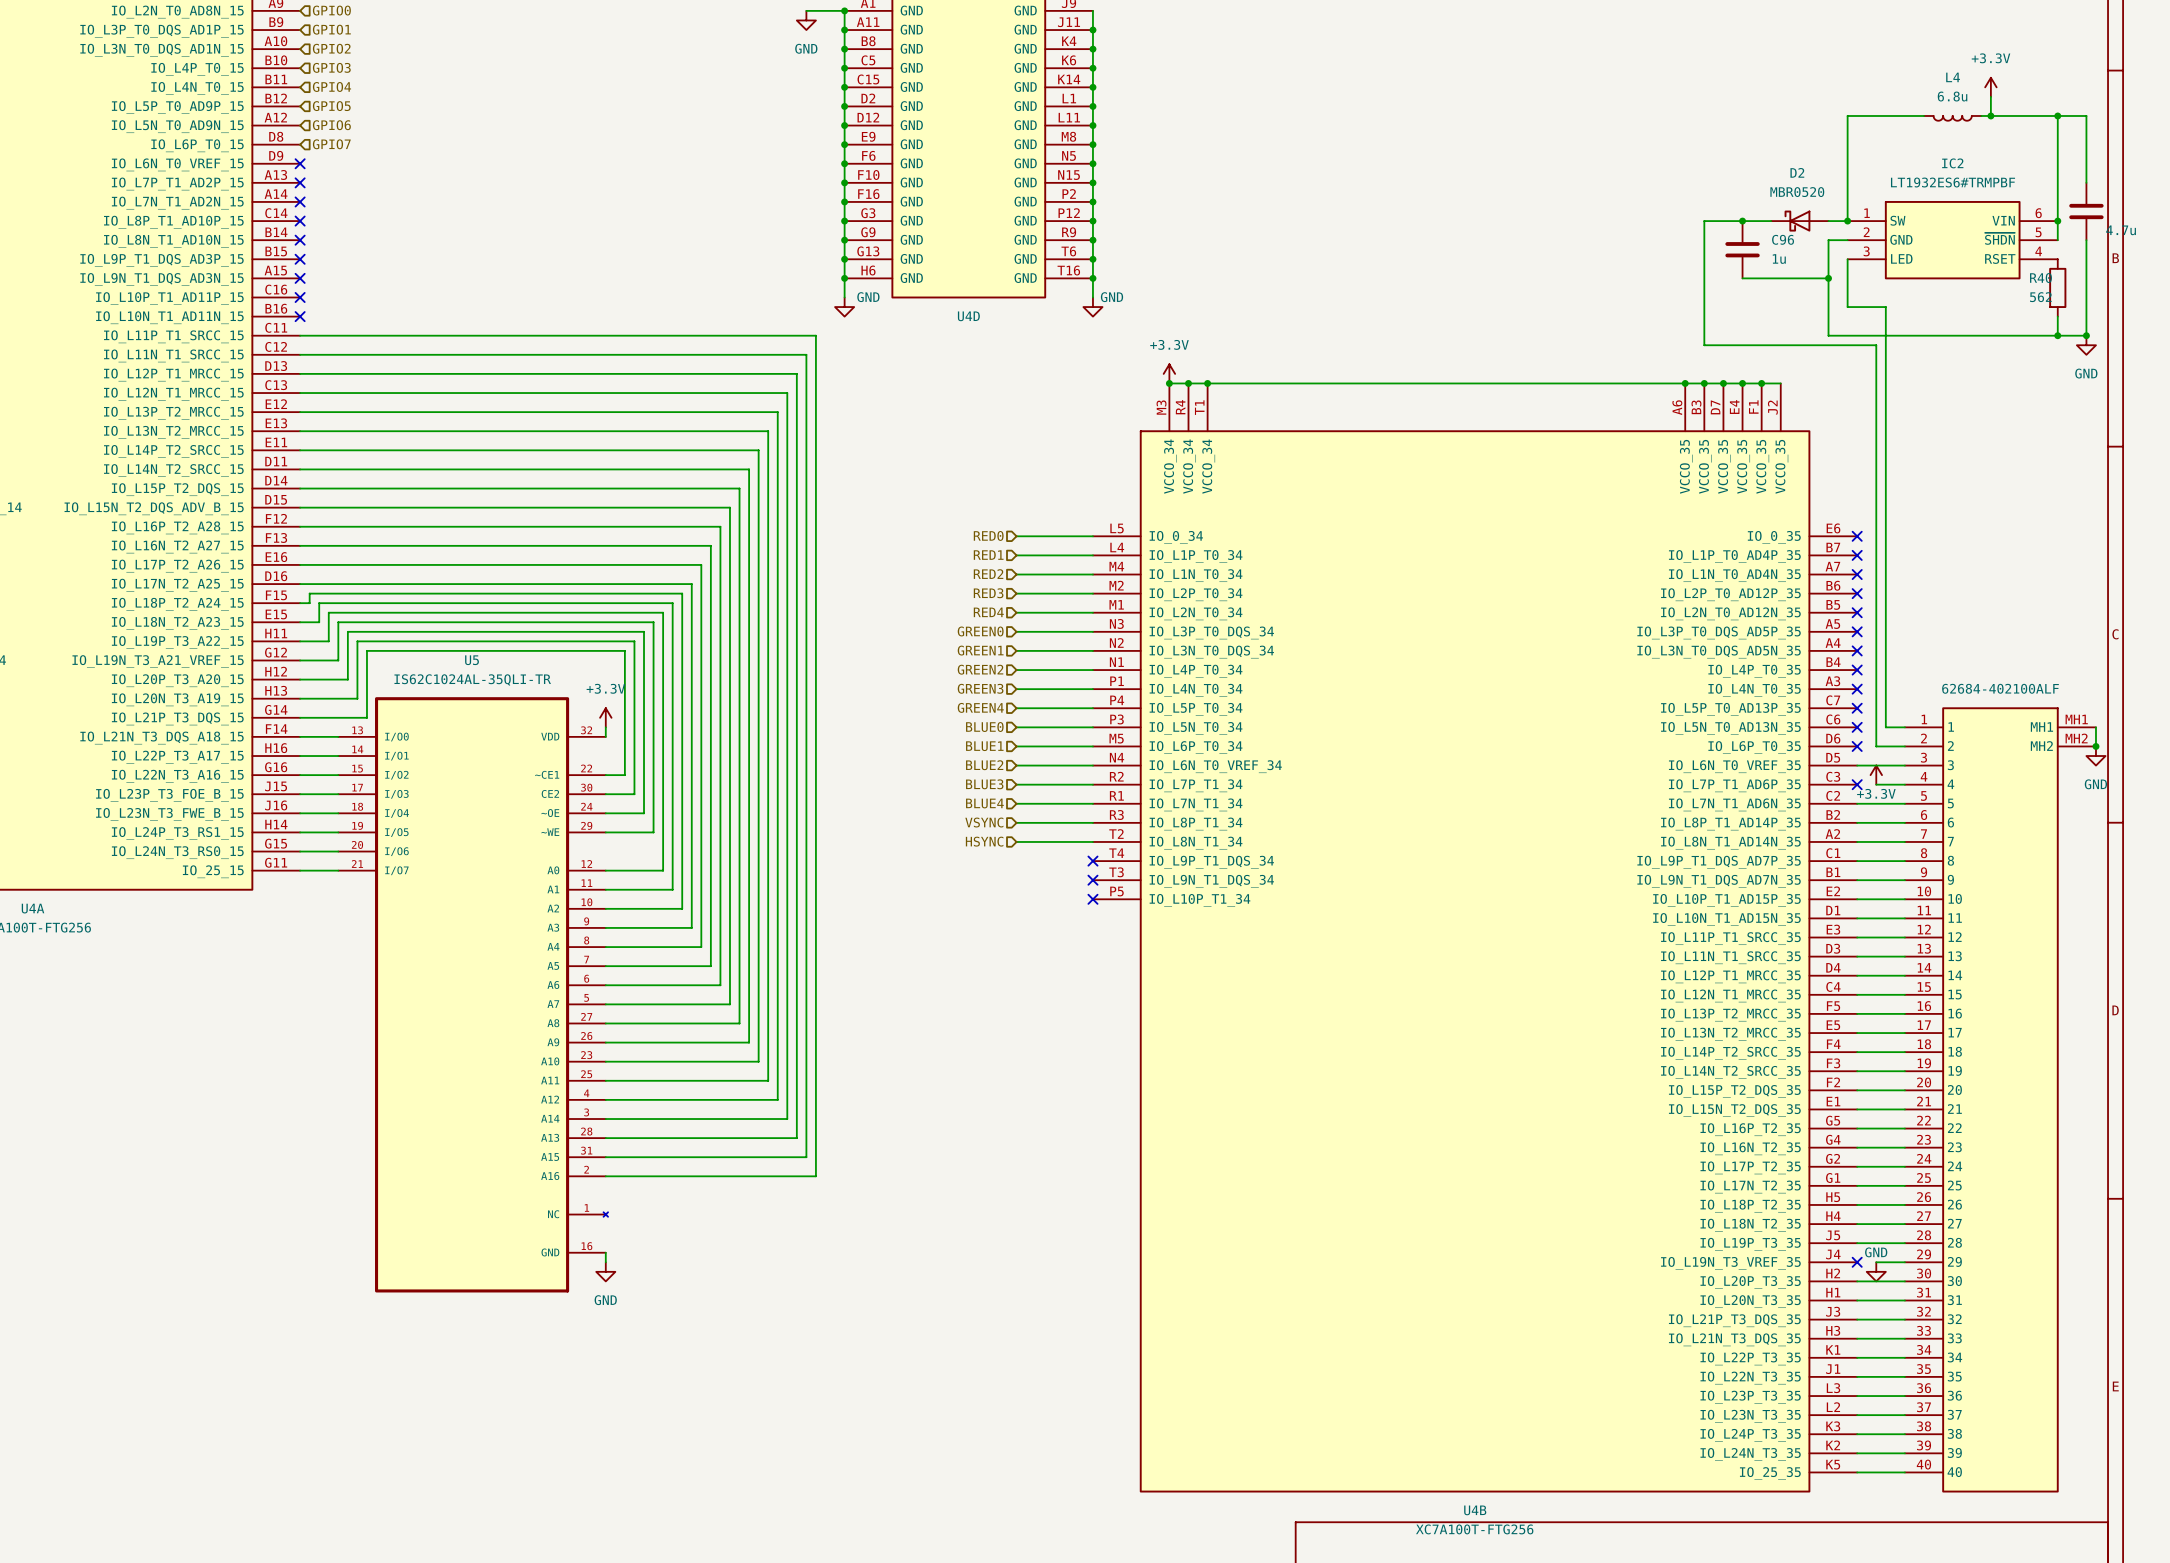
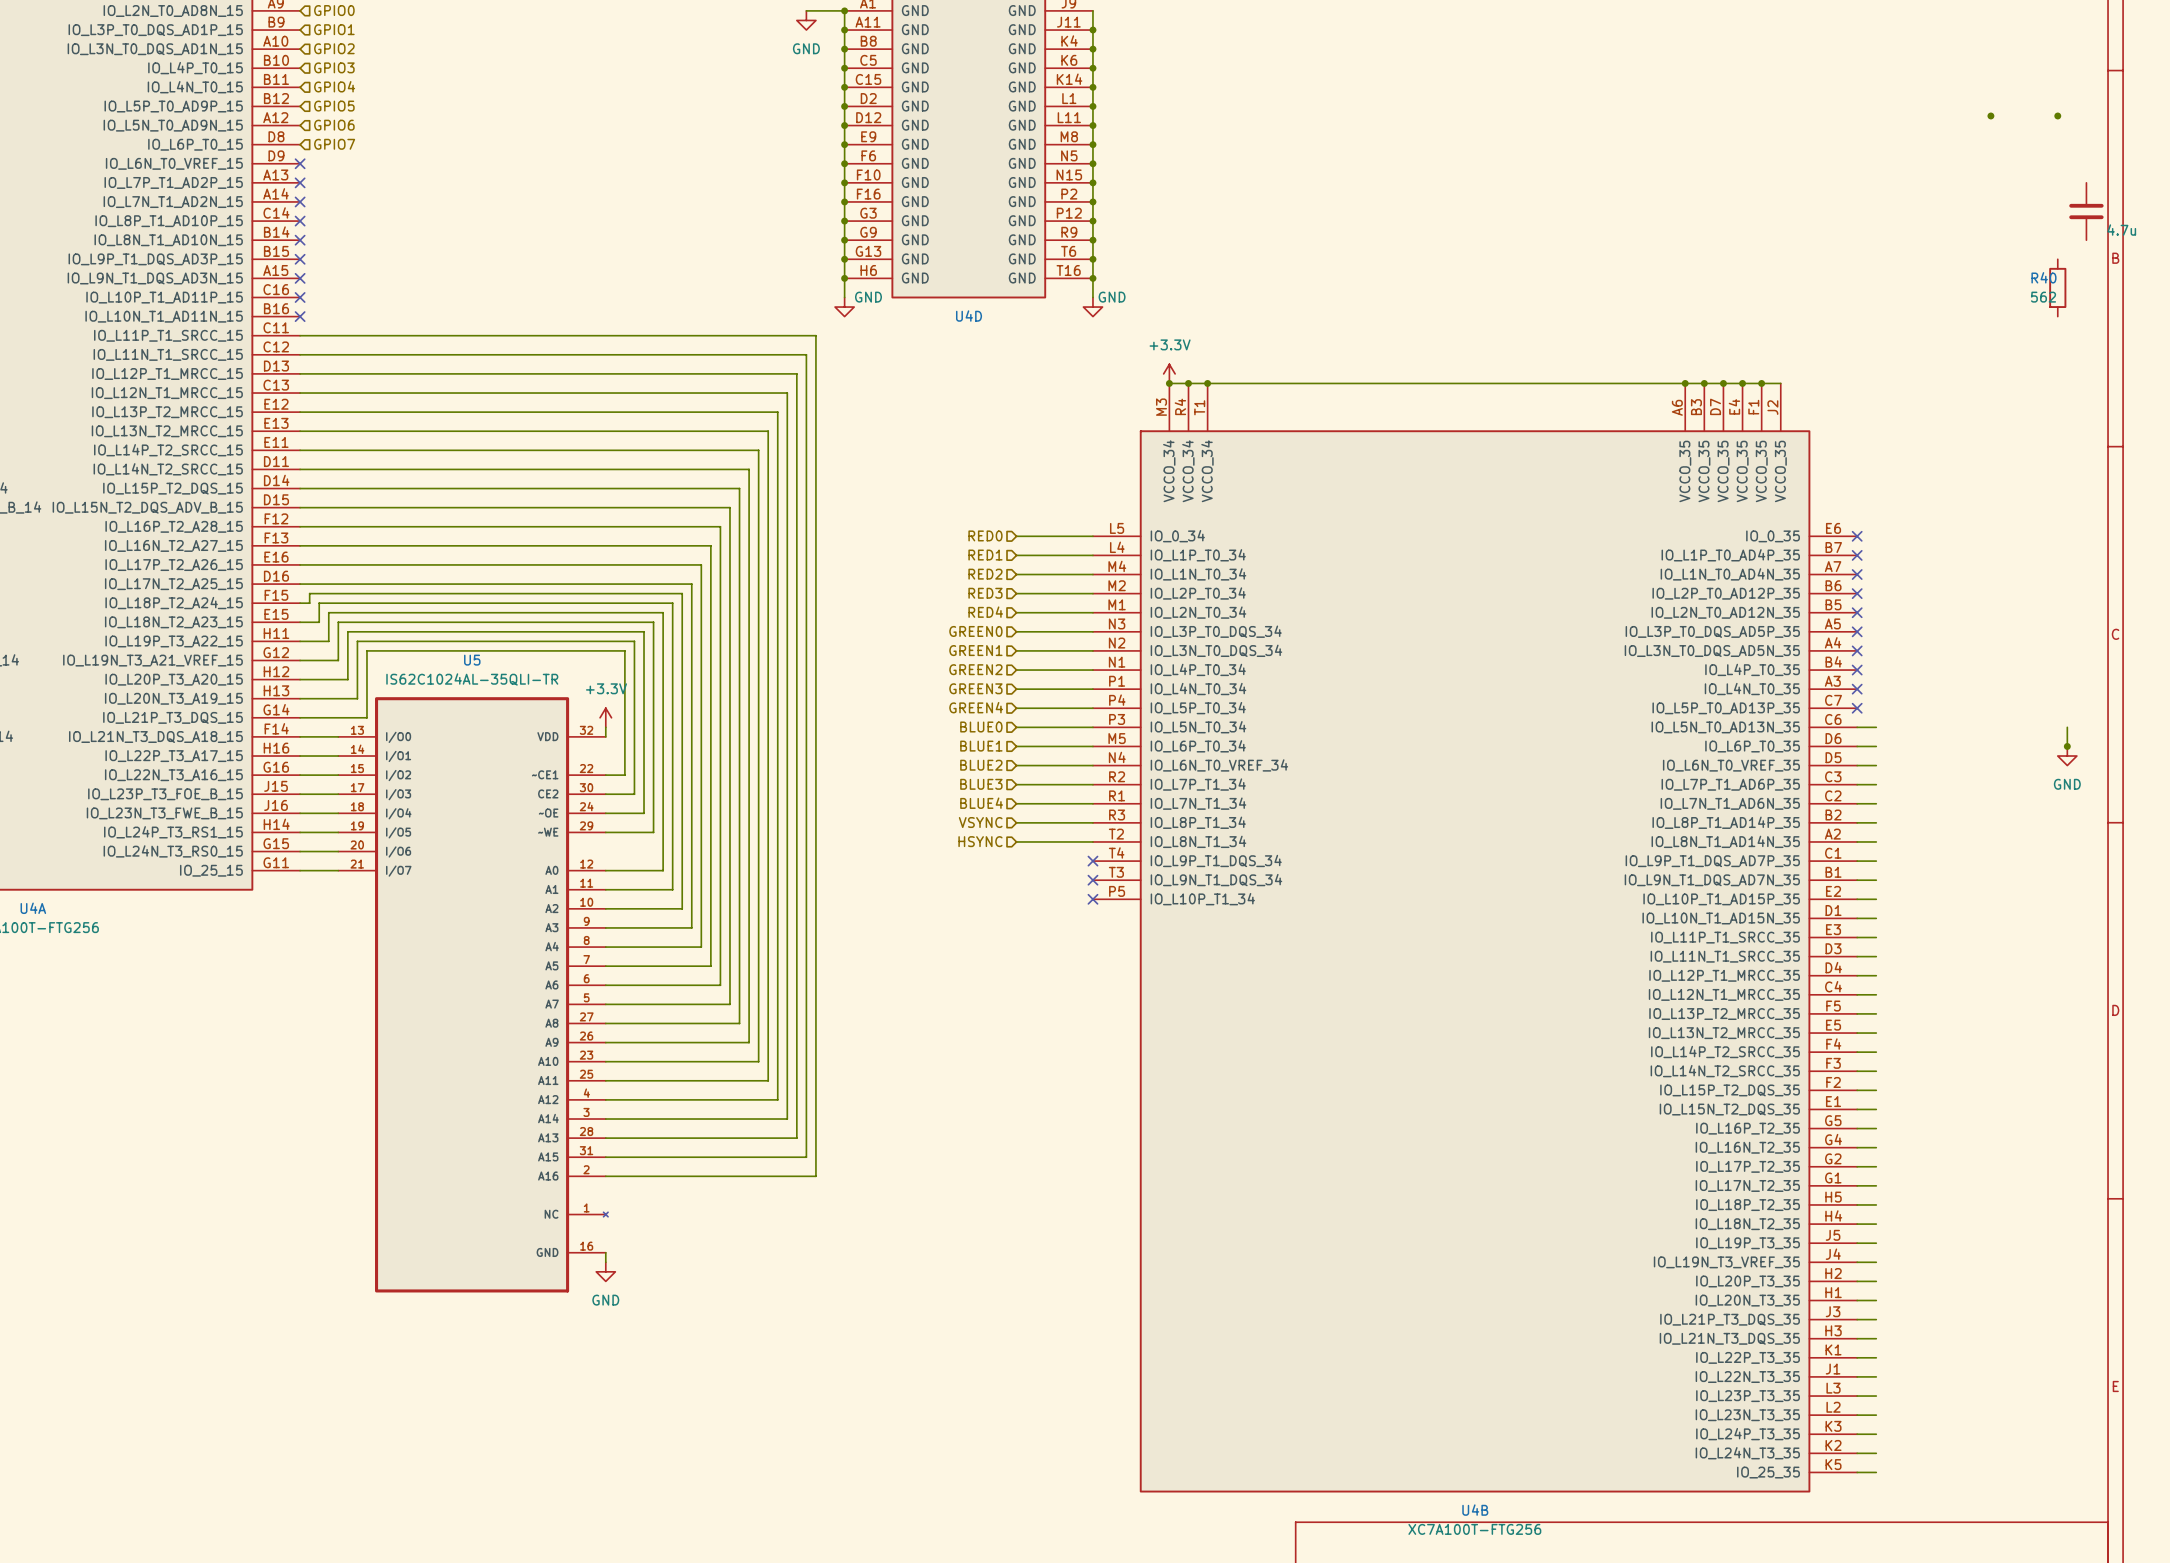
power symbol: +3.3V (1990, 87) -> none
wire: (1990, 96) (1990, 115) -> none
wire: (1924, 115) (1847, 115) (1847, 221) (1828, 221) -> none
wire: (1981, 115) (2086, 115) (2086, 182) -> none
wire: (2057, 115) (2057, 240) -> none
L4: 6.8u (1952, 118) -> none
junction: (1742, 221) -> none
wire: (1771, 221) (1704, 221) (1704, 345) (1876, 345) (1876, 746) (1904, 746) -> none
D2: MBR0520 (1799, 221) -> none
junction: (1847, 221) -> none
junction: (2057, 221) -> none
wire: (1847, 240) (1828, 240) (1828, 335) (2086, 335) (2086, 240) -> none
IC2: LT1932ES6#TRMPBF (1952, 240) -> none
C96: 1u (1742, 249) -> none
wire: (1847, 259) (1847, 307) (1885, 307) (1885, 727) (1904, 727) -> none
wire: (1742, 278) (1828, 278) -> none
junction: (1828, 278) -> none
wire: (2057, 316) (2057, 335) -> none
junction: (2057, 335) -> none
junction: (2086, 335) -> none
power symbol: GND (2086, 345) -> none
wire: none -> (1857, 727) (1876, 727)
no-connect mark: (1857, 727) -> none
wire: (2095, 727) (2095, 746) -> (2067, 727) (2067, 746)
wire: none -> (1857, 746) (1876, 746)
no-connect mark: (1857, 746) -> none
junction position: (2095, 746) -> (2067, 746)
power symbol position: GND (2095, 756) -> GND (2067, 756)
wire: (1876, 765) (1904, 765) -> none
power symbol: +3.3V (1876, 775) -> none
no-connect mark: (1857, 784) -> none
wire: (1876, 784) (1904, 784) -> (1876, 784) (1857, 784)
wire: (1876, 803) (1904, 803) -> none
wire: (1876, 822) (1904, 822) -> none
wire: (1876, 841) (1904, 841) -> none
wire: (1876, 861) (1904, 861) -> none
wire: (1876, 880) (1904, 880) -> none
wire: (1876, 899) (1904, 899) -> none
wire: (1876, 918) (1904, 918) -> none
wire: (1876, 937) (1904, 937) -> none
wire: (1876, 956) (1904, 956) -> none
wire: (1876, 975) (1904, 975) -> none
wire: (1876, 994) (1904, 994) -> none
wire: (1876, 1013) (1904, 1013) -> none
wire: (1876, 1033) (1904, 1033) -> none
wire: (1876, 1052) (1904, 1052) -> none
wire: (1876, 1071) (1904, 1071) -> none
wire: (1876, 1090) (1904, 1090) -> none
part: 62684-402100ALF (2000, 1099) -> none
wire: (1876, 1109) (1904, 1109) -> none
wire: (1876, 1128) (1904, 1128) -> none
wire: (1876, 1147) (1904, 1147) -> none
wire: (1876, 1166) (1904, 1166) -> none
wire: (1876, 1185) (1904, 1185) -> none
wire: (1876, 1204) (1904, 1204) -> none
wire: (1876, 1224) (1904, 1224) -> none
wire: (1876, 1243) (1904, 1243) -> none
no-connect mark: (1857, 1262) -> none
wire: (1876, 1262) (1904, 1262) -> (1876, 1262) (1857, 1262)
power symbol: GND (1876, 1271) -> none
wire: (1876, 1281) (1904, 1281) -> none
wire: (1876, 1300) (1904, 1300) -> none
wire: (1876, 1319) (1904, 1319) -> none
wire: (1876, 1338) (1904, 1338) -> none
wire: (1876, 1357) (1904, 1357) -> none
wire: (1876, 1376) (1904, 1376) -> none
wire: (1876, 1396) (1904, 1396) -> none
wire: (1876, 1415) (1904, 1415) -> none
wire: (1876, 1434) (1904, 1434) -> none
wire: (1876, 1453) (1904, 1453) -> none
wire: (1876, 1472) (1904, 1472) -> none

